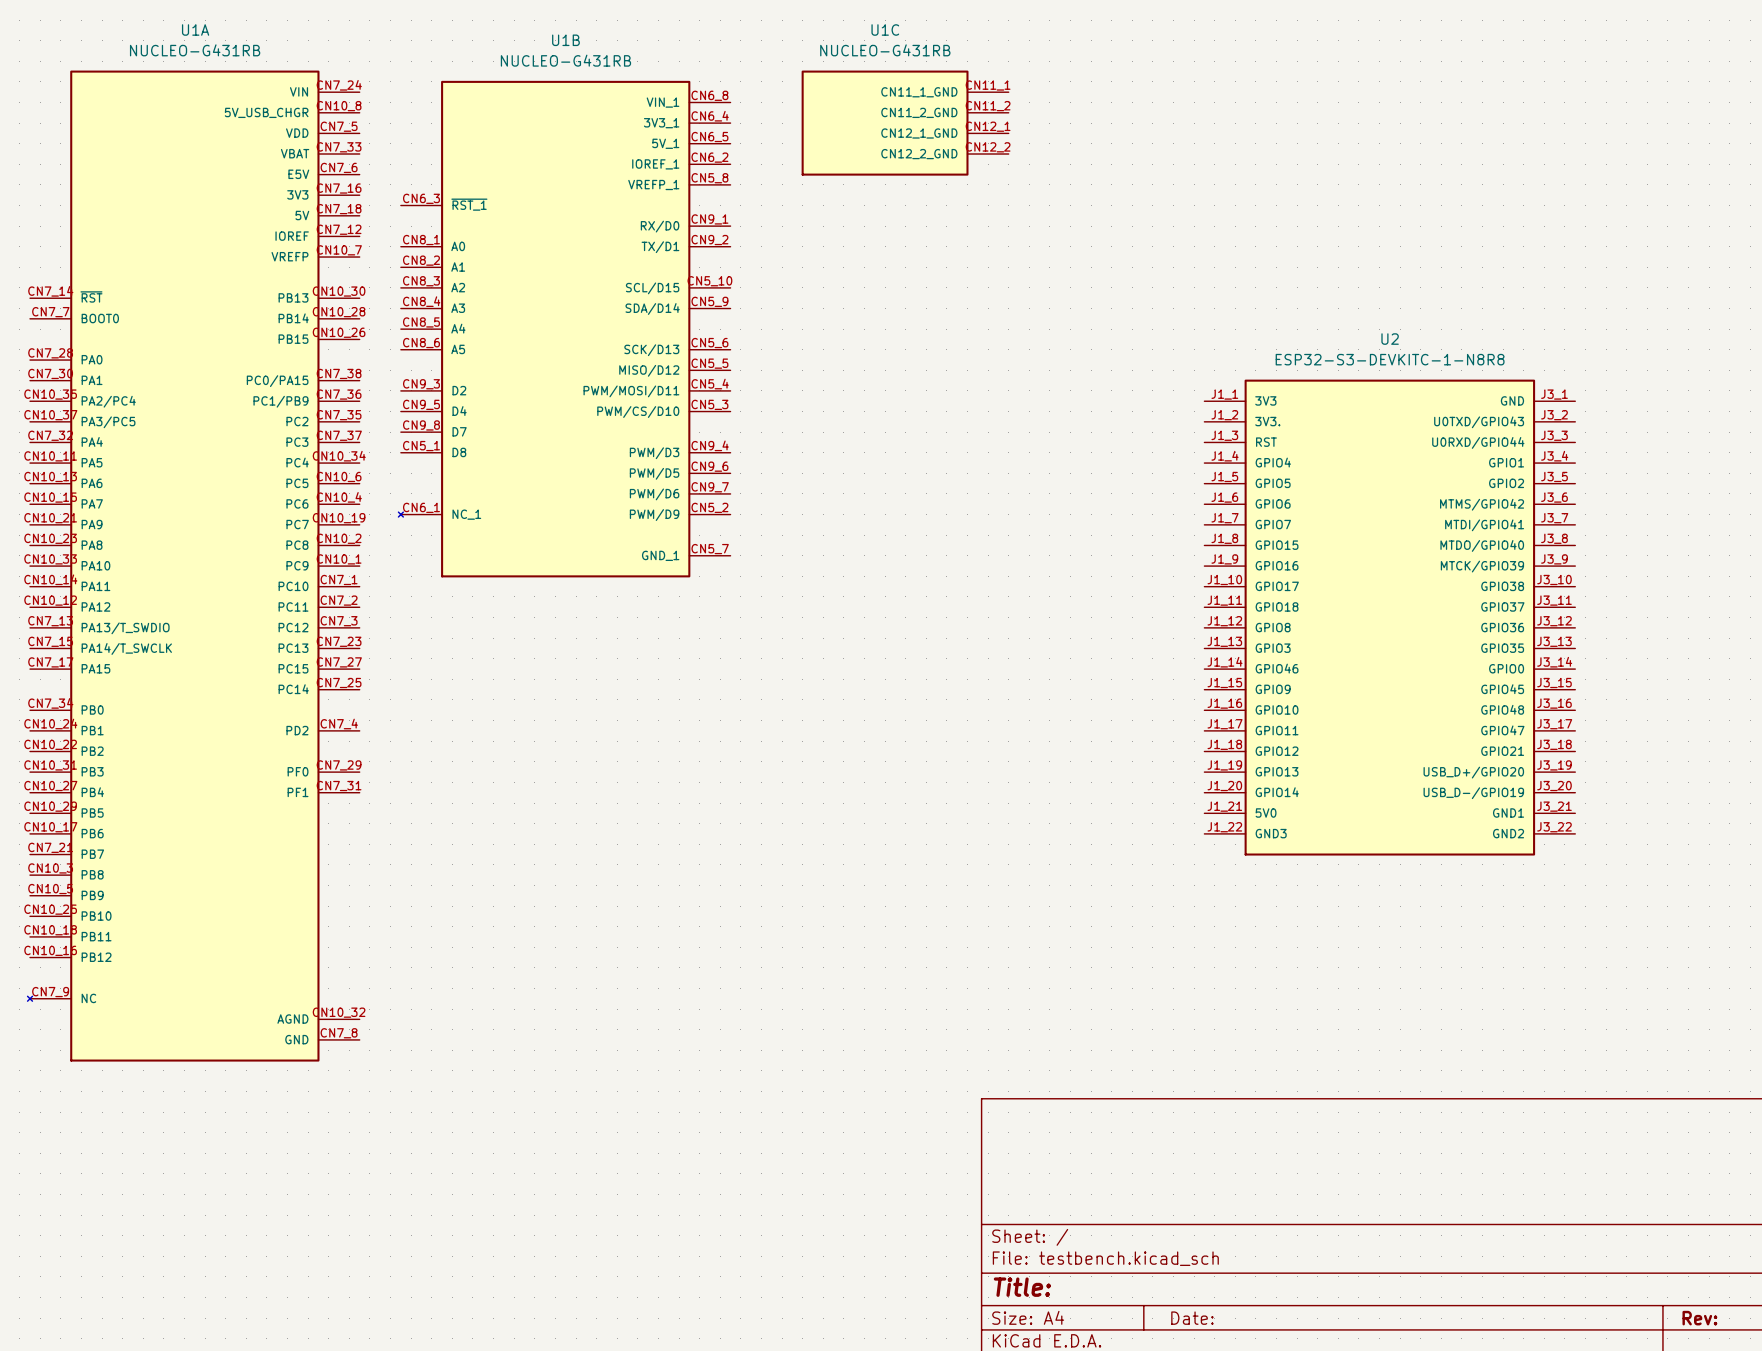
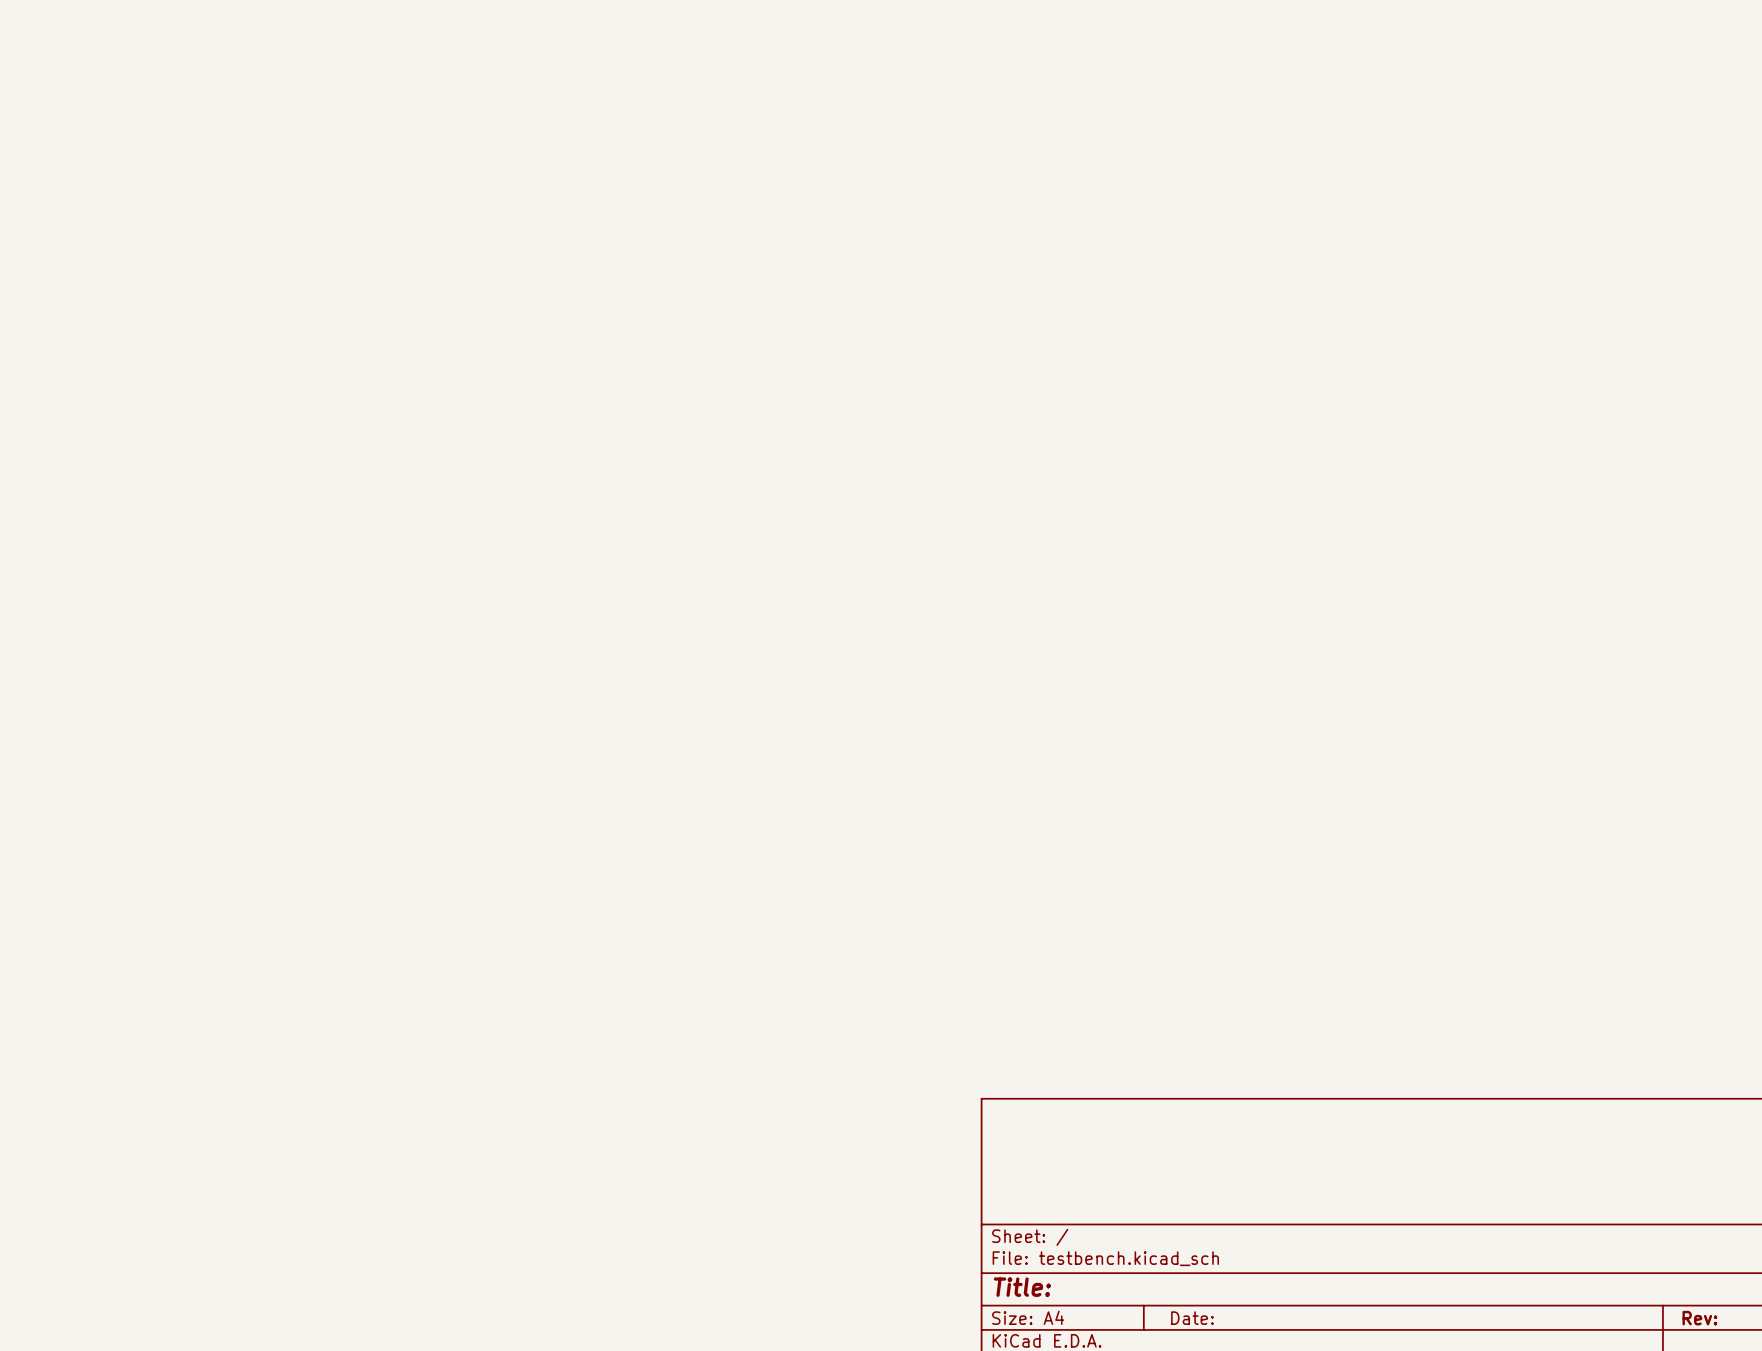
U1C: NUCLEO-G431RB (905, 123) -> none
U1B: NUCLEO-G431RB (564, 329) -> none
U1A: NUCLEO-G431RB (193, 566) -> none
U2: ESP32-S3-DEVKITC-1-N8R8 (1389, 617) -> none

